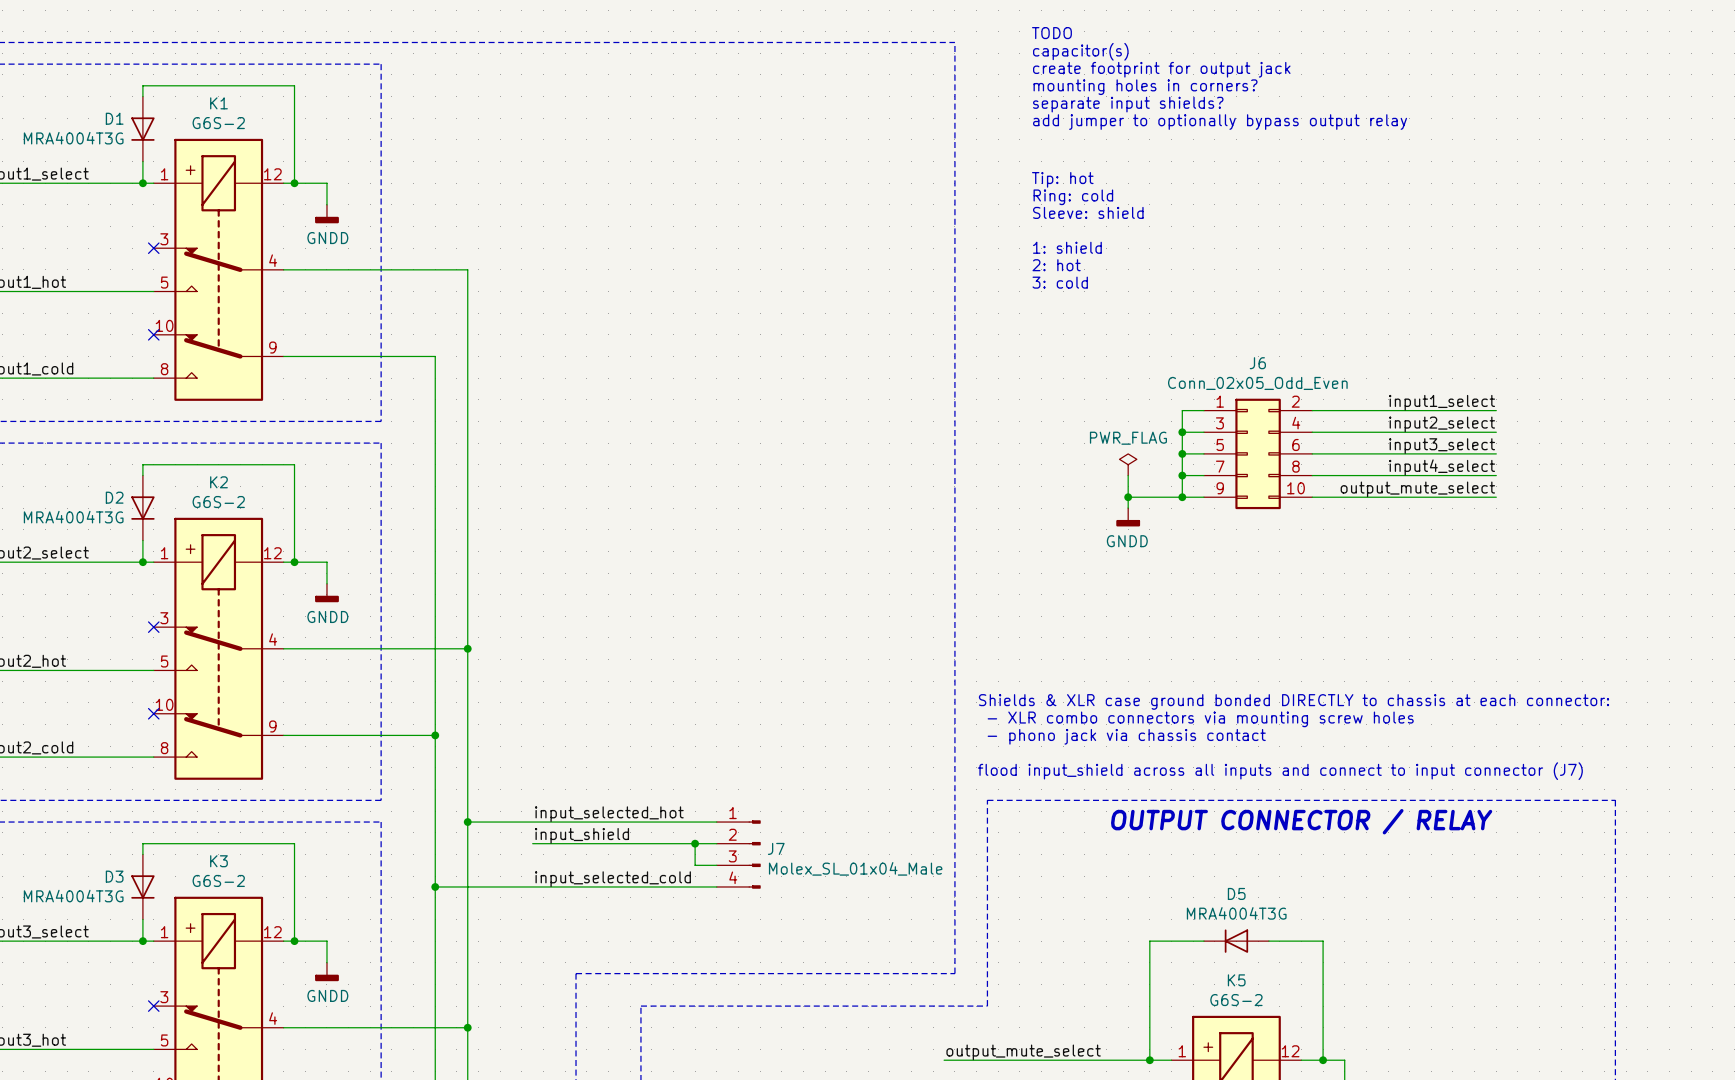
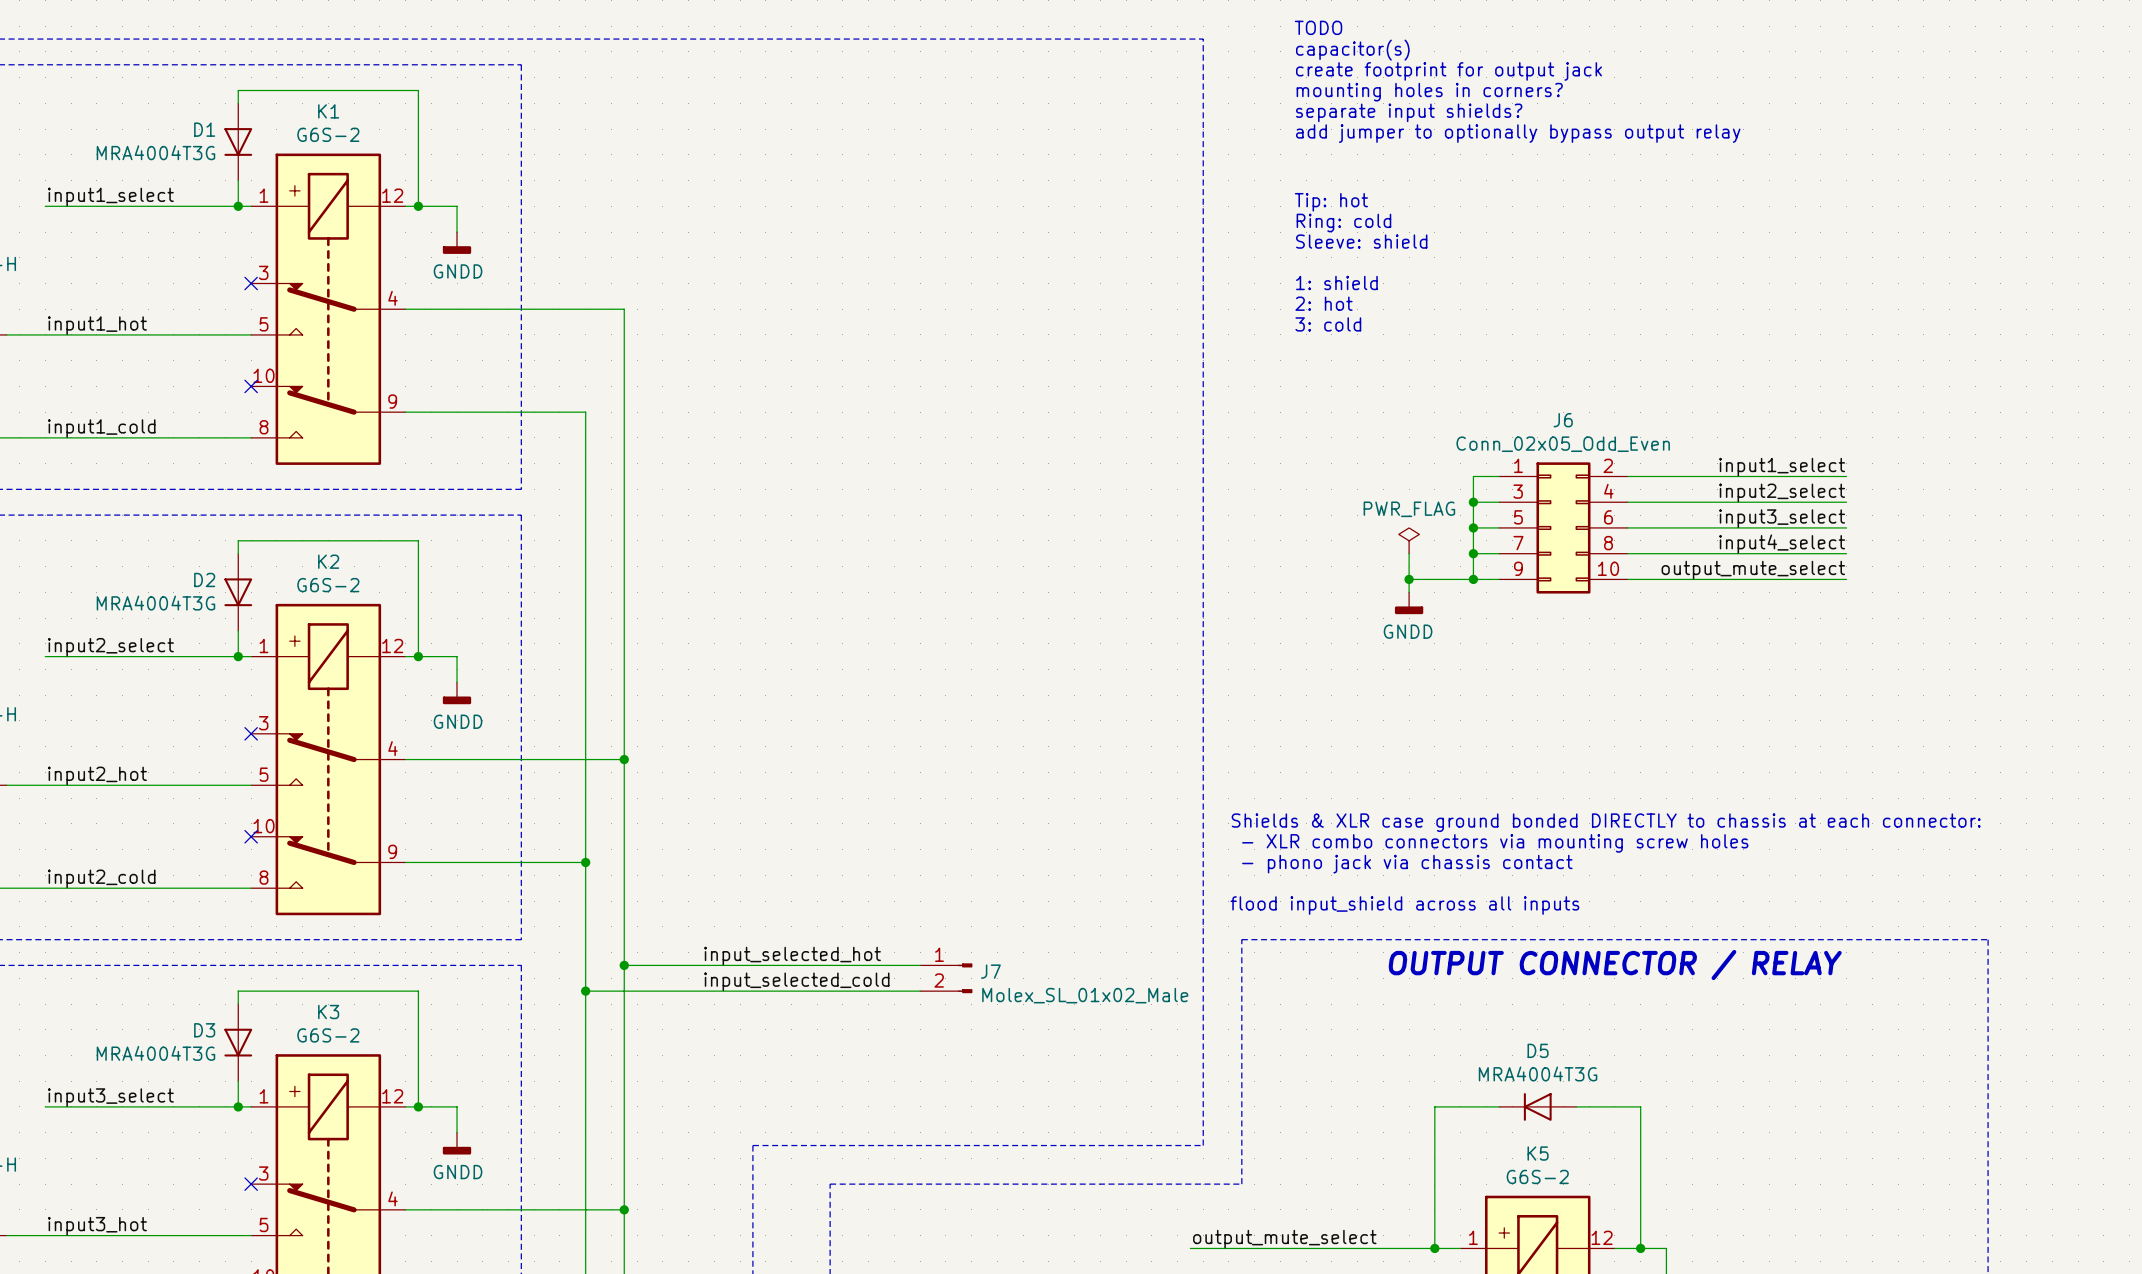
text: flood input_shield across all inputs and connect to input connector (J7) (1280, 771) -> flood input_shield across all inputs (1404, 905)
J7 symbol: [716, 820, 761, 889] -> [920, 963, 973, 994]
label: input_shield (582, 835) -> input_selected_cold (796, 981)
wire: none -> (585, 991) (701, 991)
wire: (695, 843) (695, 865) (716, 865) -> none
junction: (695, 843) -> none
J7 value: Molex_SL_01x04_Male (855, 868) -> Molex_SL_01x02_Male (1085, 995)
label: input_selected_cold (612, 879) -> none
wire: (435, 886) (716, 886) -> none
junction position: (435, 886) -> (585, 991)

